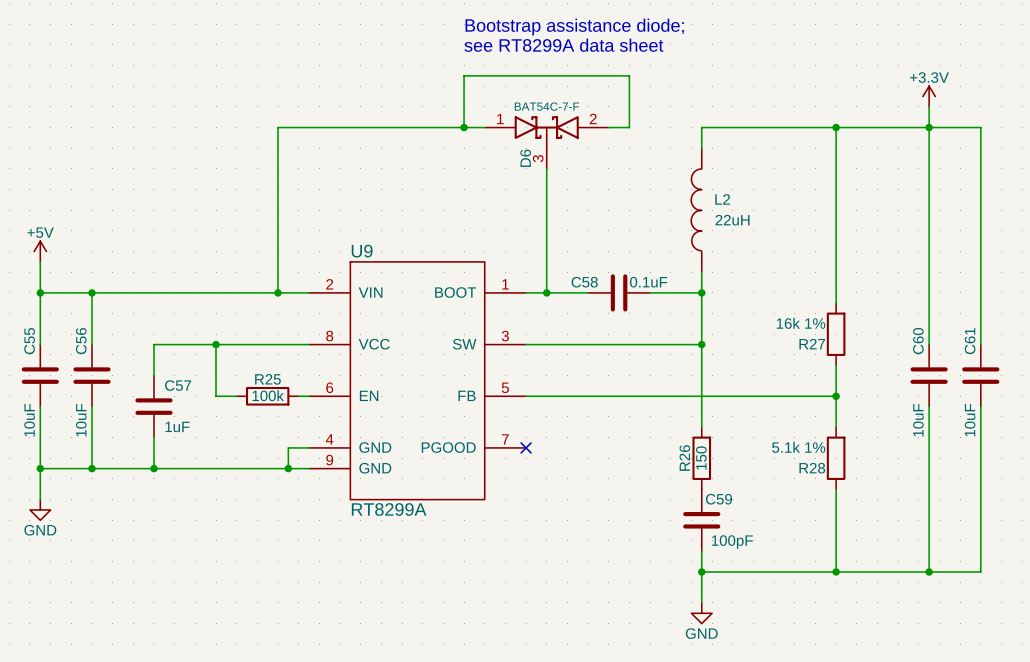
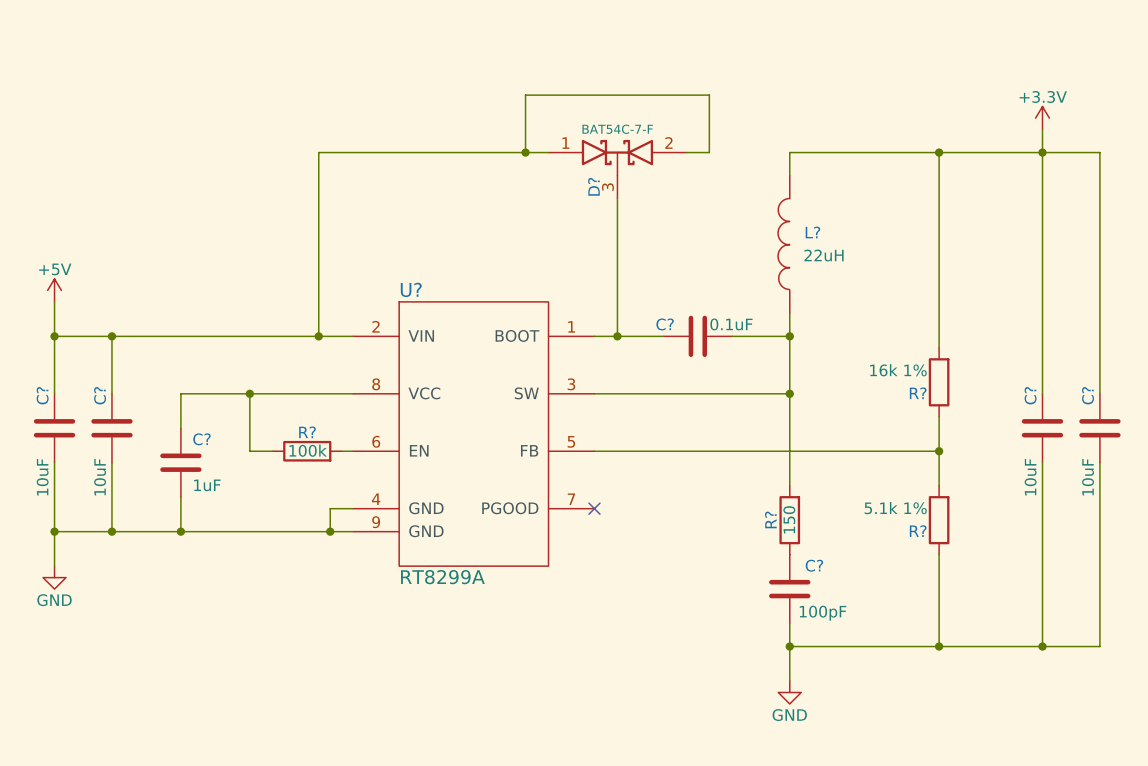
text: Bootstrap assistance diode; (574, 27) -> none
text: see RT8299A data sheet (563, 45) -> none
D6 name: D6 (525, 158) -> D? (593, 186)
L2 name: L2 (722, 199) -> L? (812, 232)
U9 name: U9 (362, 251) -> U? (411, 289)
C58 name: C58 (584, 282) -> C? (665, 324)
C55 name: C55 (29, 341) -> C? (42, 395)
C56 name: C56 (81, 341) -> C? (100, 395)
C60 name: C60 (918, 341) -> C? (1030, 395)
C61 name: C61 (970, 341) -> C? (1088, 395)
R27 name: R27 (812, 344) -> R? (918, 393)
R25 name: R25 (267, 379) -> R? (307, 432)
C57 name: C57 (178, 385) -> C? (201, 439)
R26 name: R26 (684, 457) -> R? (770, 519)
R28 name: R28 (812, 468) -> R? (918, 531)
C59 name: C59 (719, 499) -> C? (814, 565)

